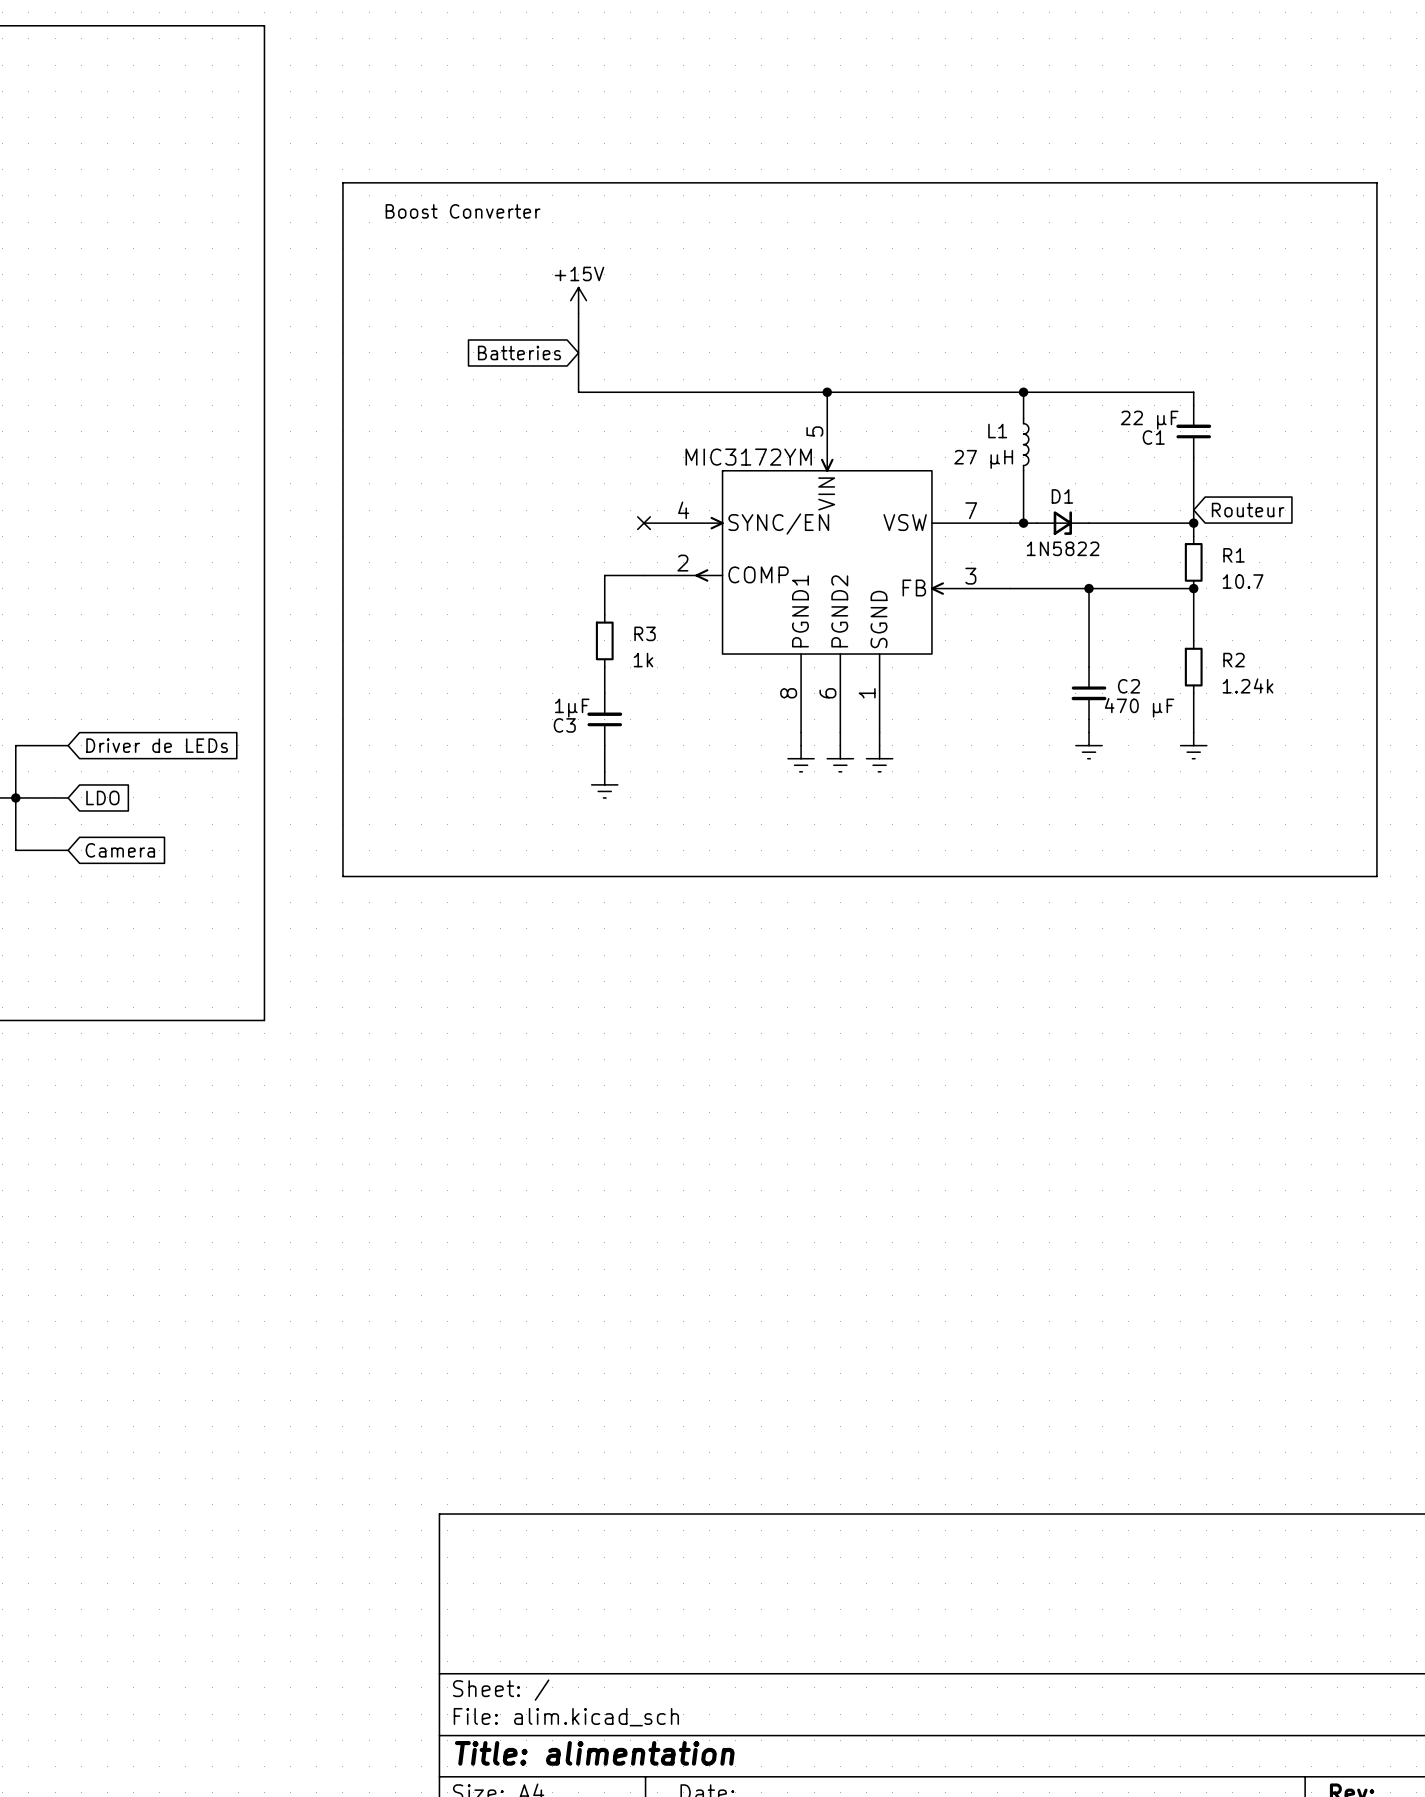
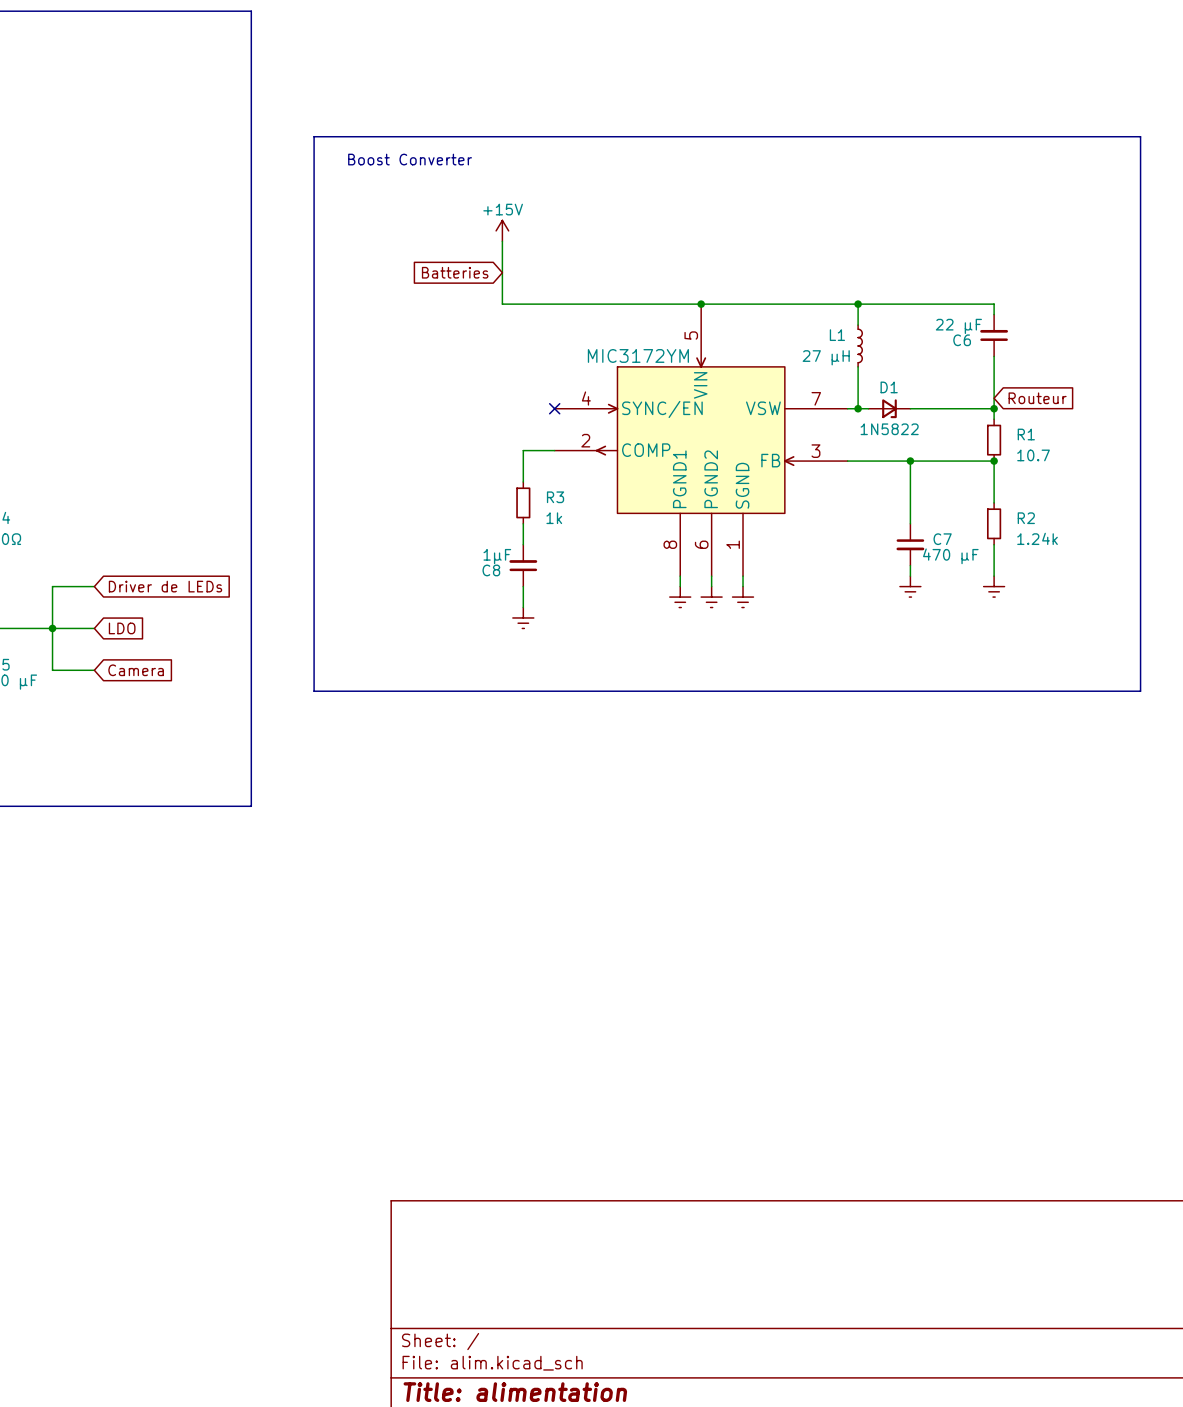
C1 name: C1 (1153, 437) -> C6 (962, 340)
C2 name: C2 (1128, 686) -> C7 (942, 539)
C3 name: C3 (564, 725) -> C8 (491, 570)

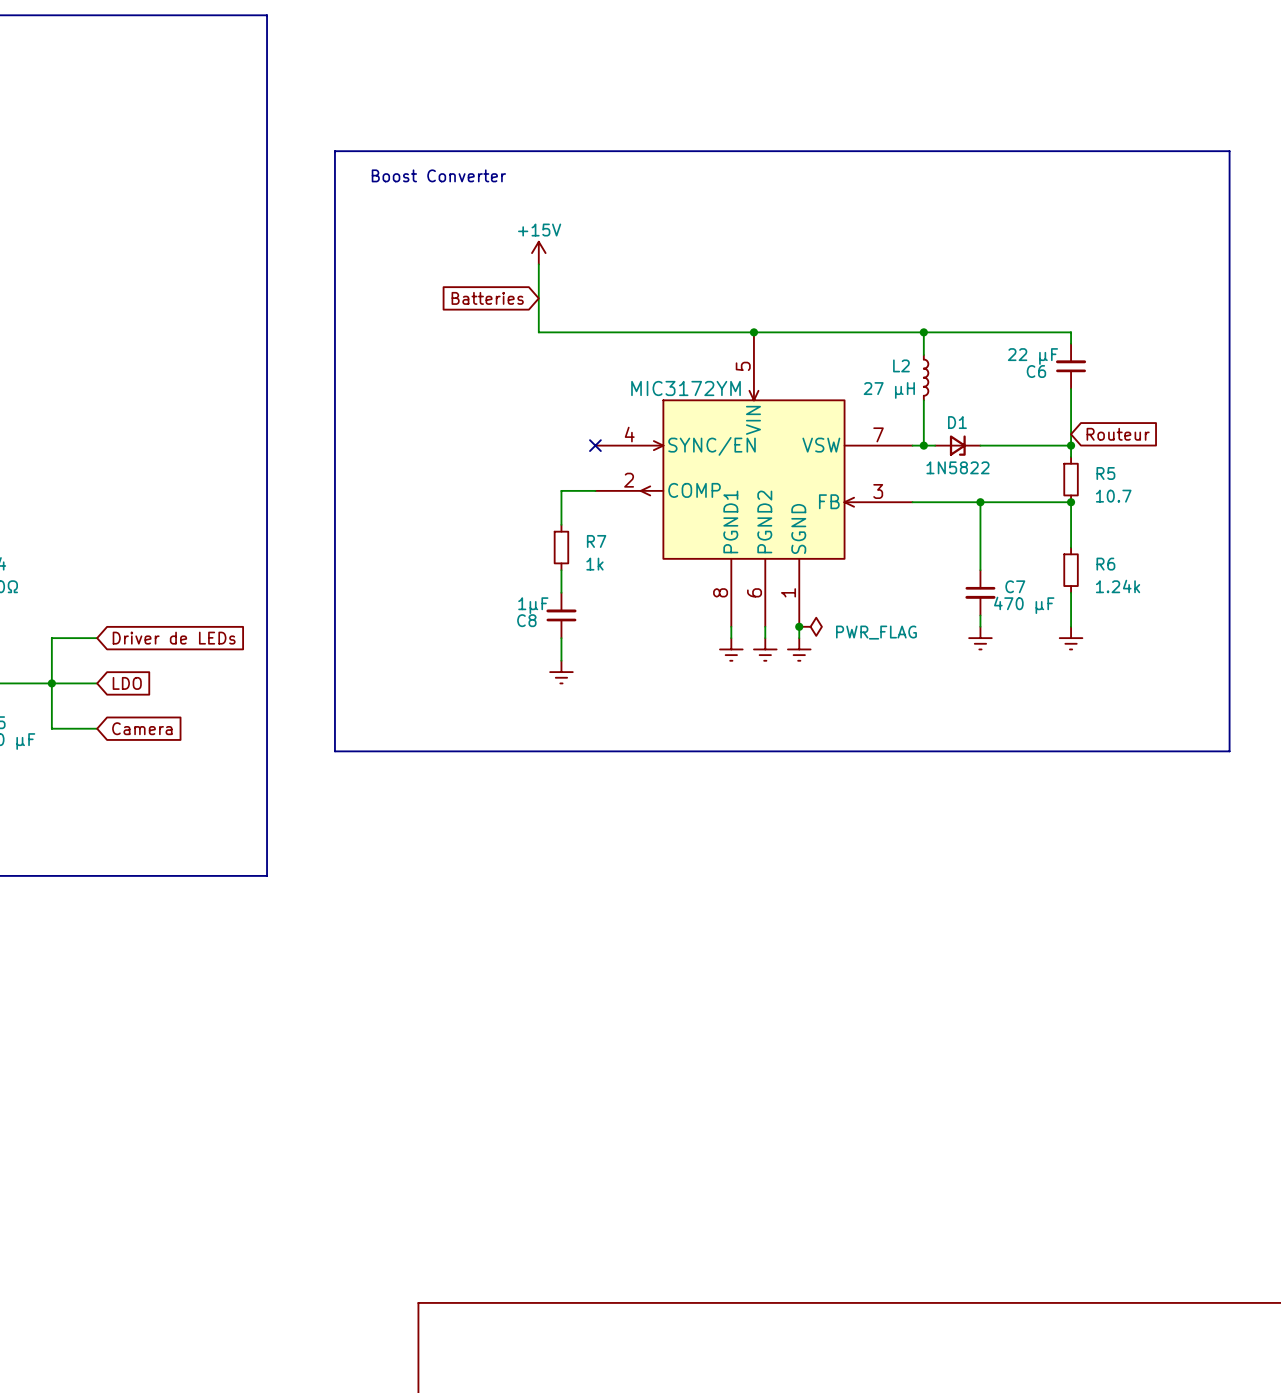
L1 name: L1 (837, 335) -> L2 (901, 365)
R1 name: R1 (1026, 434) -> R5 (1105, 473)
R3 name: R3 (555, 497) -> R7 (596, 541)
R2 name: R2 (1026, 518) -> R6 (1105, 564)
junction: none -> (799, 626)
power symbol: none -> PWR_FLAG (810, 626)

